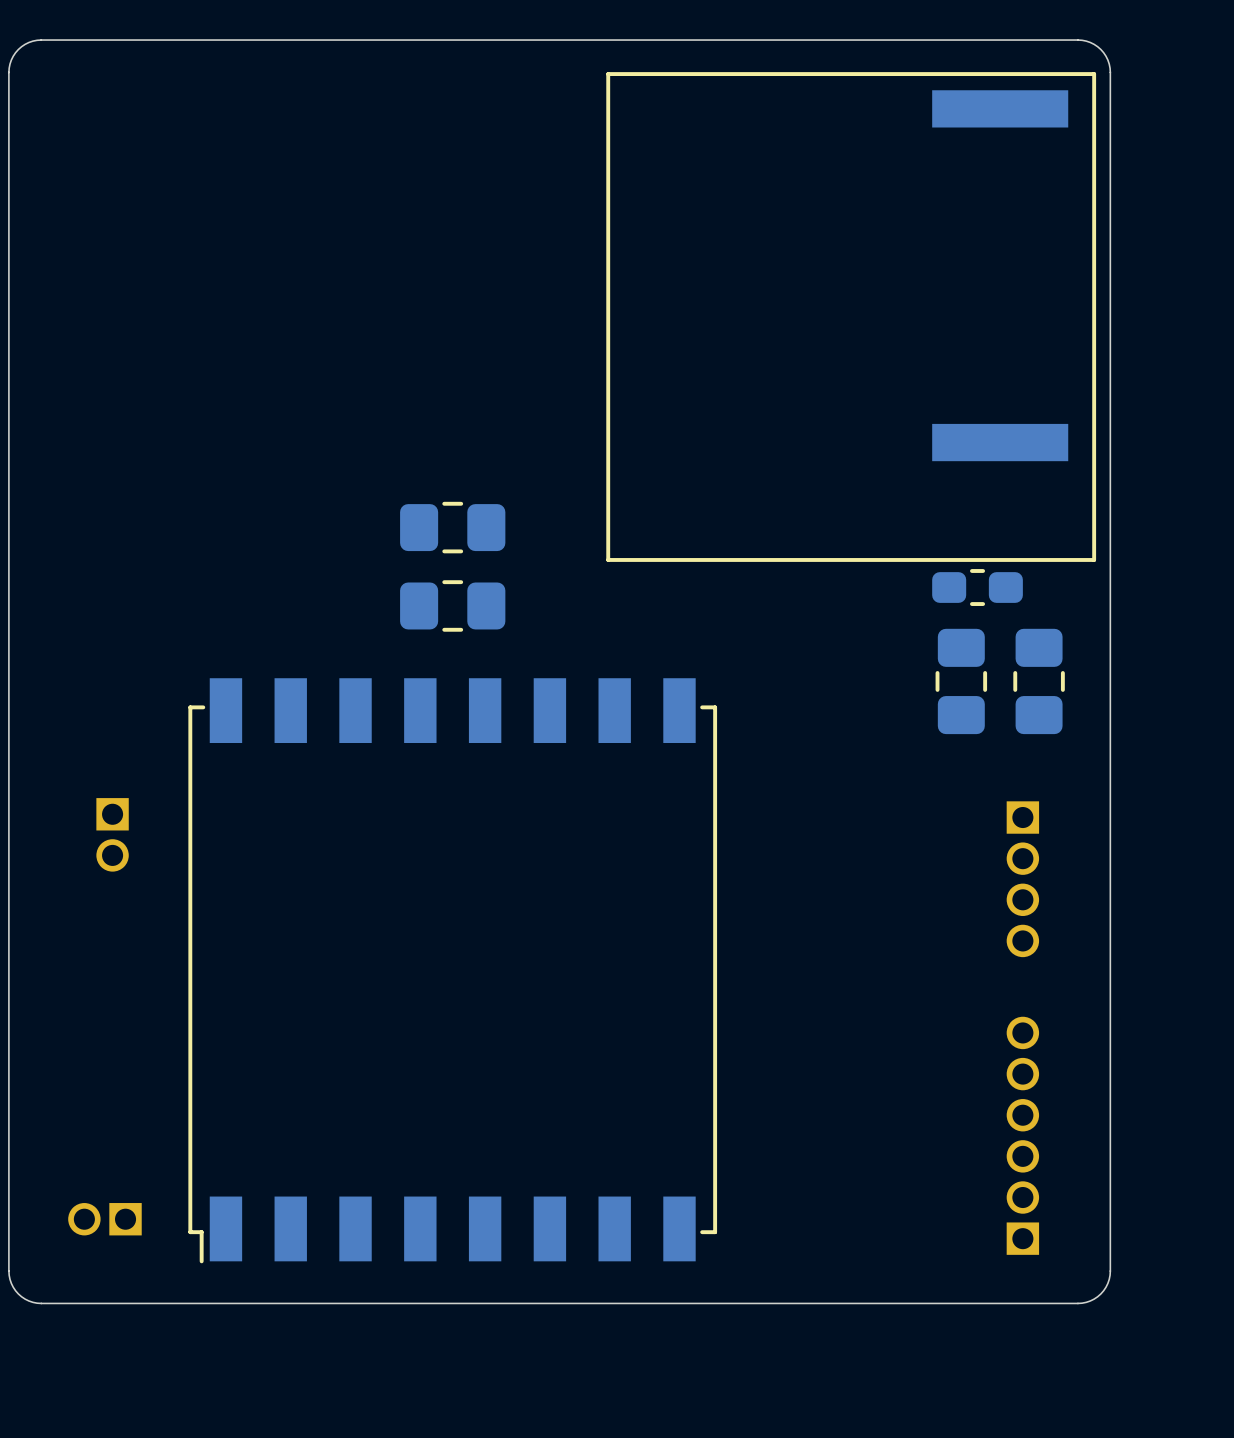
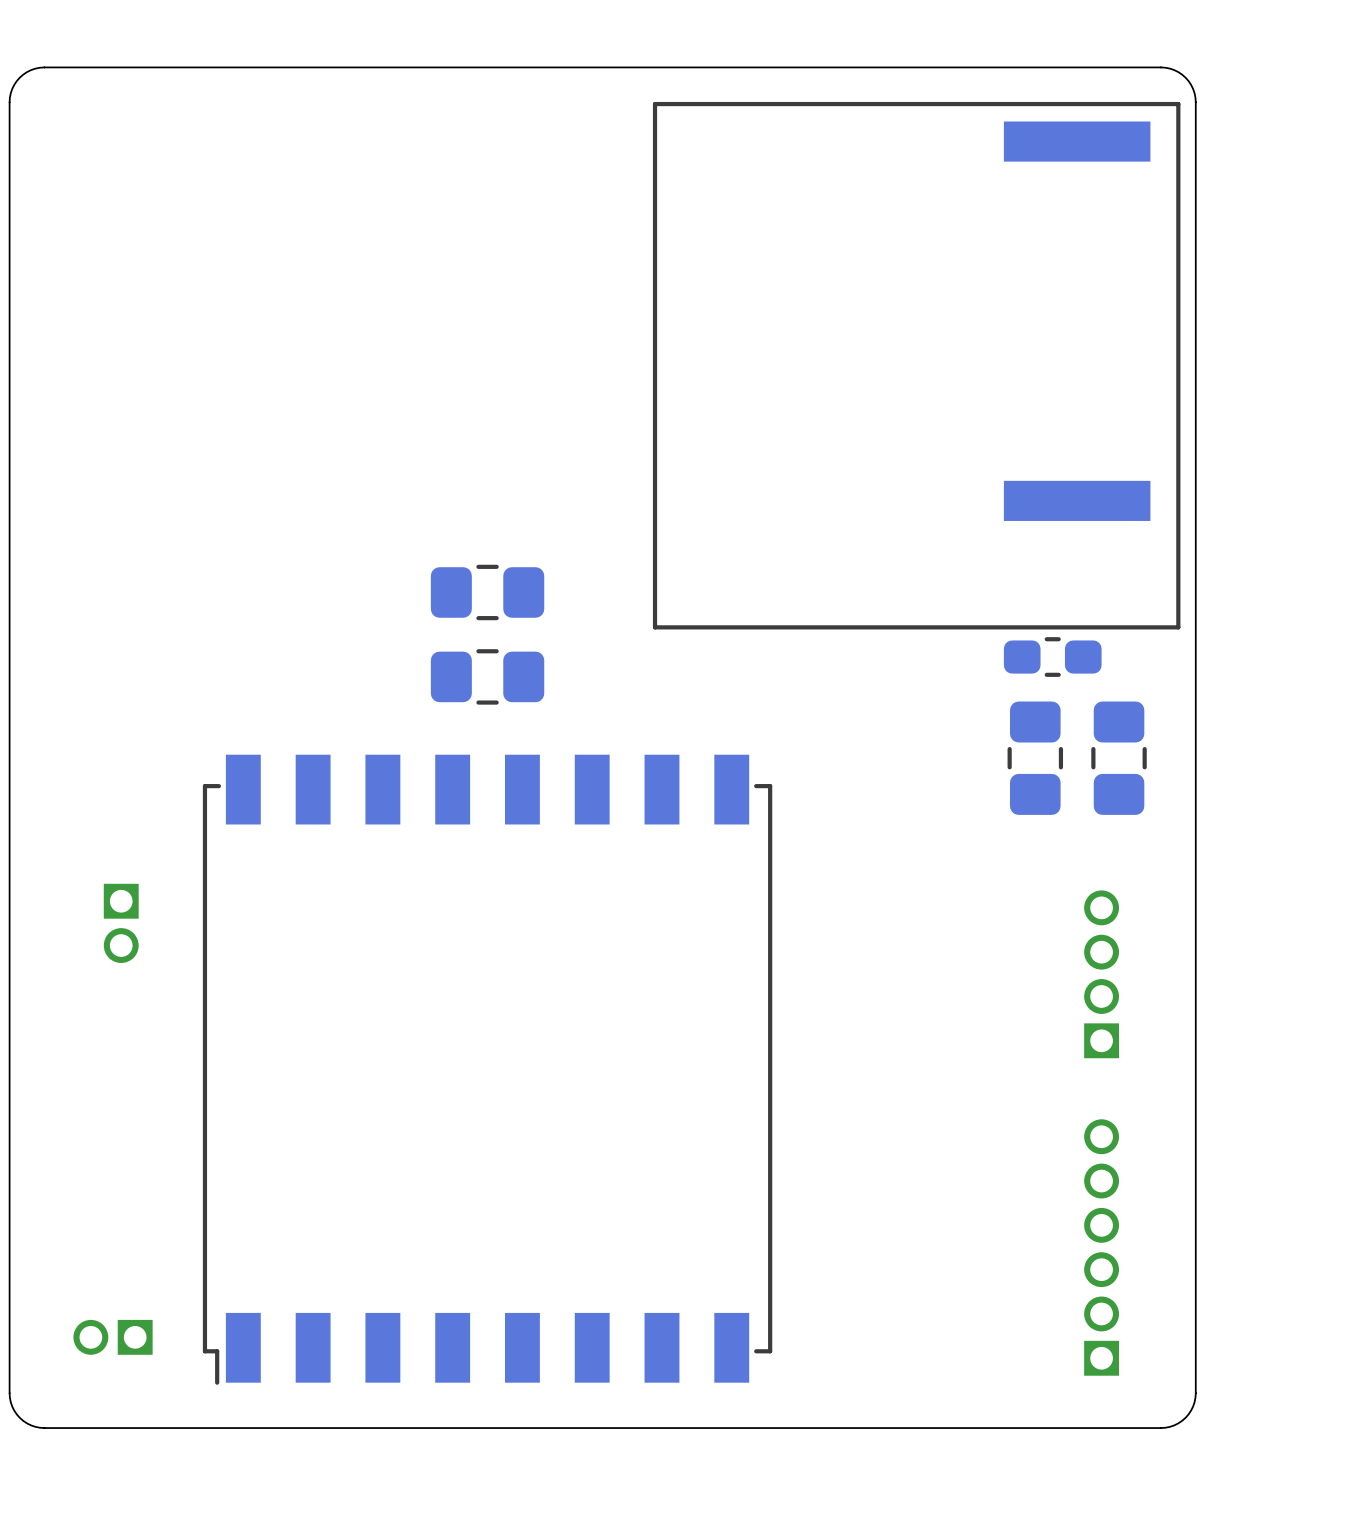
part rotation: 0° (1022, 879) -> 180° (1101, 974)

